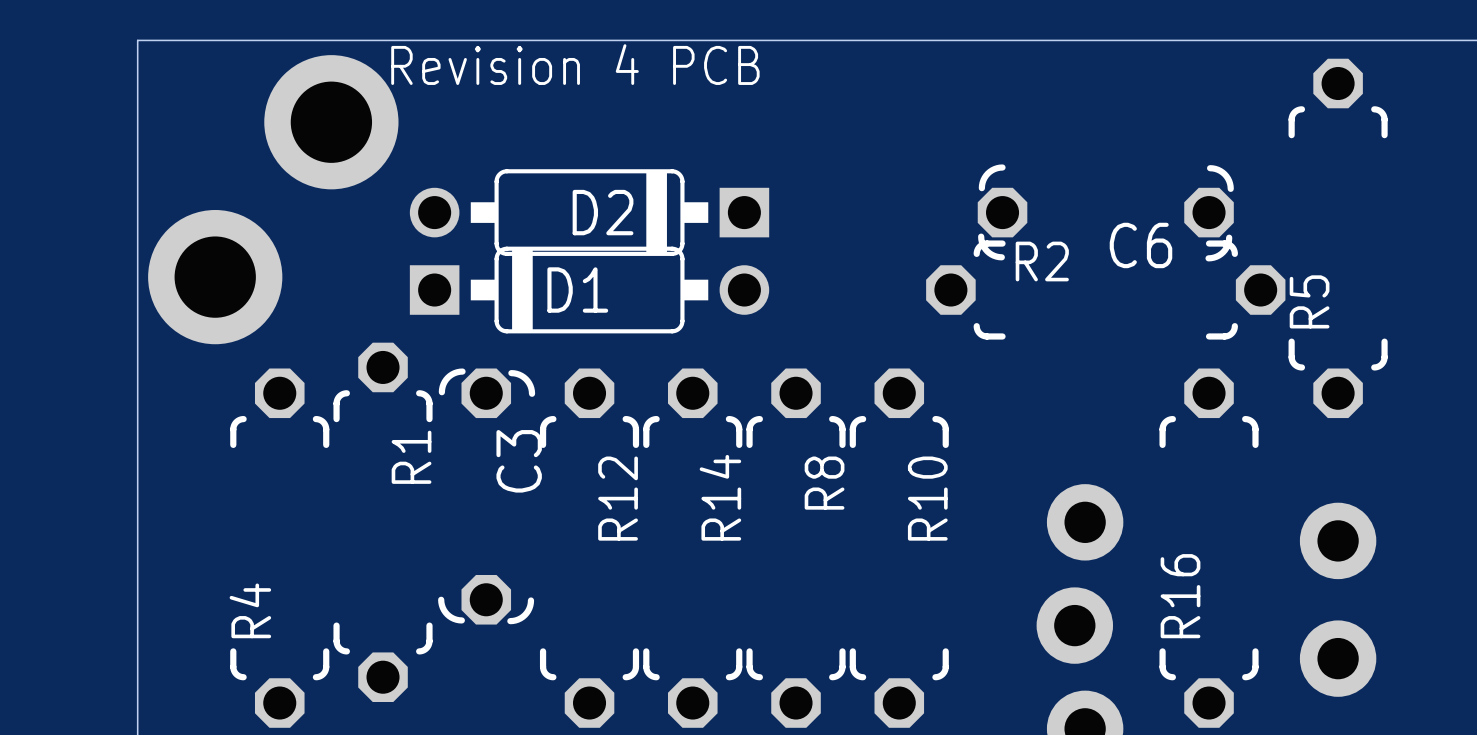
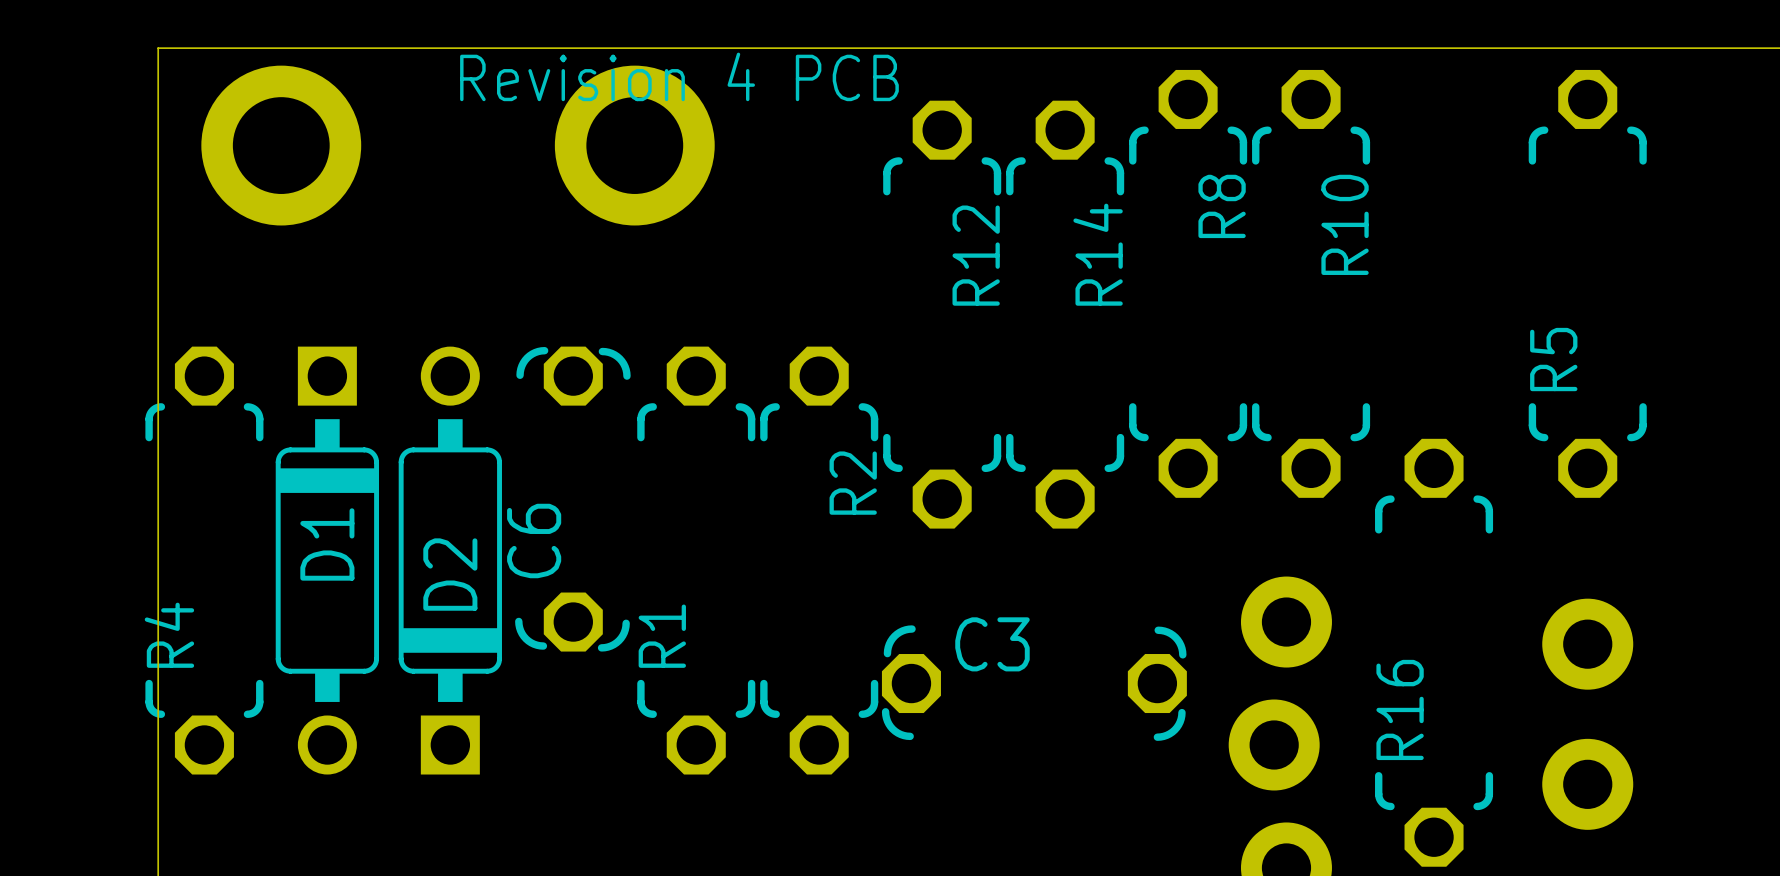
part: none -> (281, 145)
part: (331, 122) -> none
part: none -> (634, 145)
D2 rotation: 0° (589, 212) -> 90° clockwise (450, 560)
D2 position: (589, 212) -> (450, 560)
C6 rotation: 0° (1105, 212) -> 90° clockwise (572, 499)
C6 position: (1105, 212) -> (572, 499)
part: (215, 277) -> none
D1 rotation: 0° (589, 290) -> 90° clockwise (327, 560)
D1 position: (589, 290) -> (327, 560)
R2 rotation: 0° (1105, 290) -> 90° clockwise (819, 560)
R2 position: (1105, 290) -> (819, 560)
R1 name position: R1 (411, 457) -> R1 (662, 636)
C3 rotation: 0° (486, 496) -> 90° clockwise (1034, 683)
C3 position: (486, 496) -> (1034, 683)
R1 position: (383, 522) -> (696, 560)
R4 position: (279, 548) -> (204, 560)
R12 position: (589, 548) -> (942, 314)
R14 position: (692, 548) -> (1065, 314)
R8 position: (796, 548) -> (1188, 283)
R10 position: (899, 548) -> (1311, 283)

